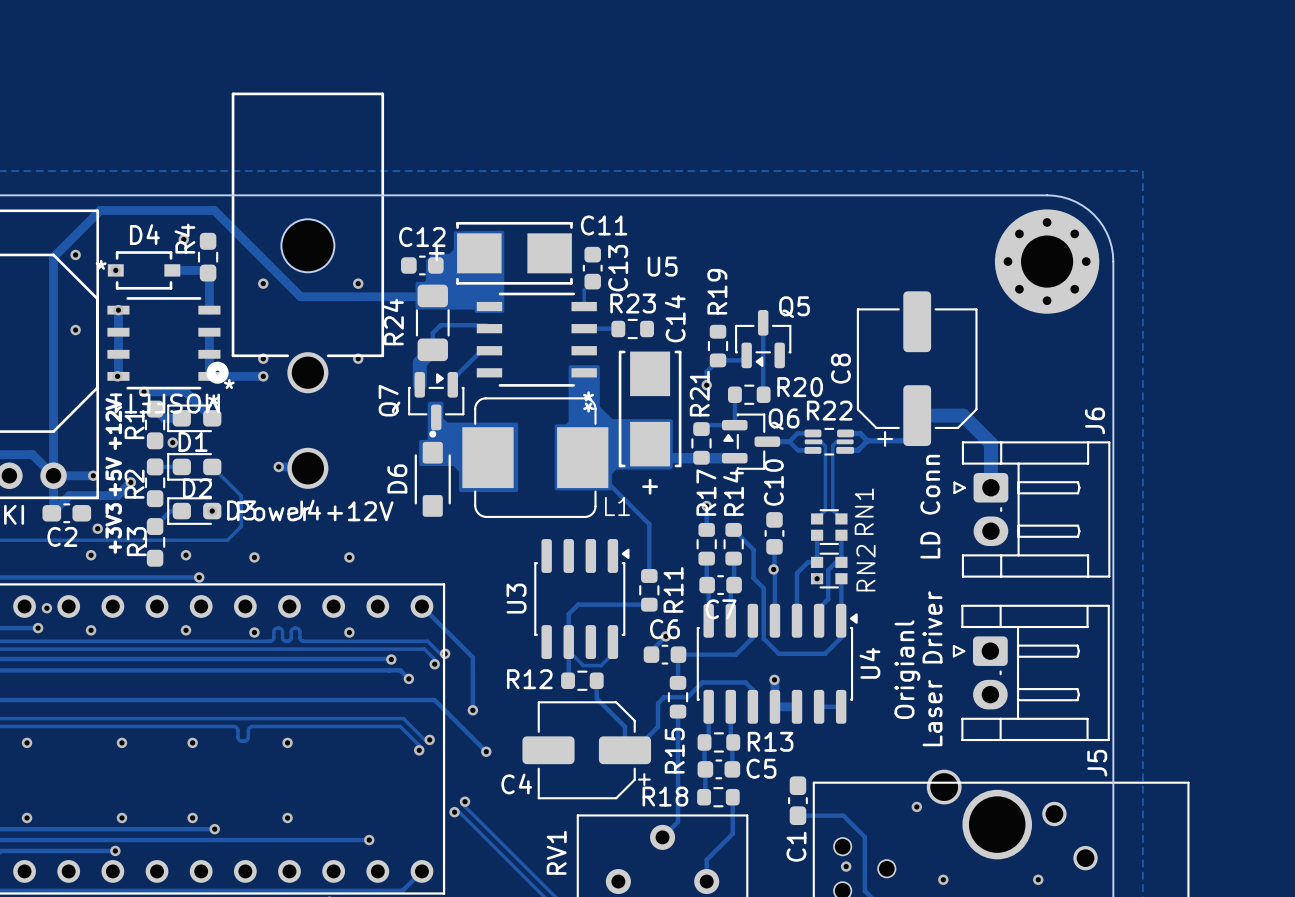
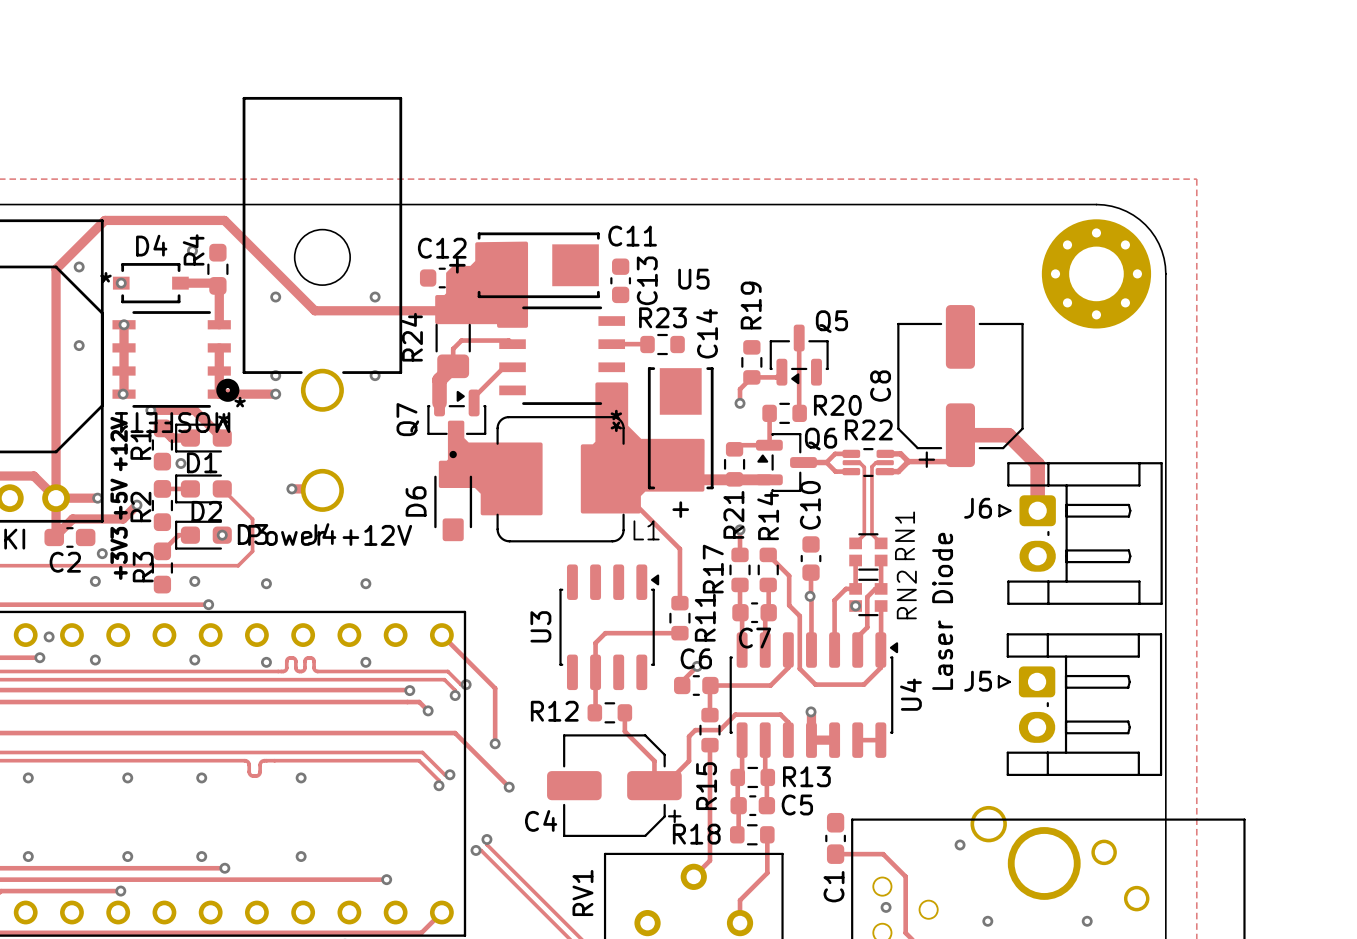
track: (592, 281) (584, 290) (584, 306) -> none
R21 name position: R21 (699, 393) -> R21 (733, 514)
J6 name rotation: 0° (1095, 420) -> 90° clockwise (978, 508)
J6 name position: J6 (1095, 420) -> J6 (978, 508)
R17 name position: R17 (706, 492) -> R17 (713, 569)
text: LD Conn (930, 506) -> none
track: (568, 642) (568, 650) (583, 665) (601, 665) (612, 653) (612, 642) -> none
text: Laser Driver (932, 668) -> none
text: Origianl (907, 669) -> Laser Diode (942, 611)
J5 name rotation: 0° (1097, 763) -> 90° clockwise (978, 681)
J5 name position: J5 (1097, 763) -> J5 (978, 681)

